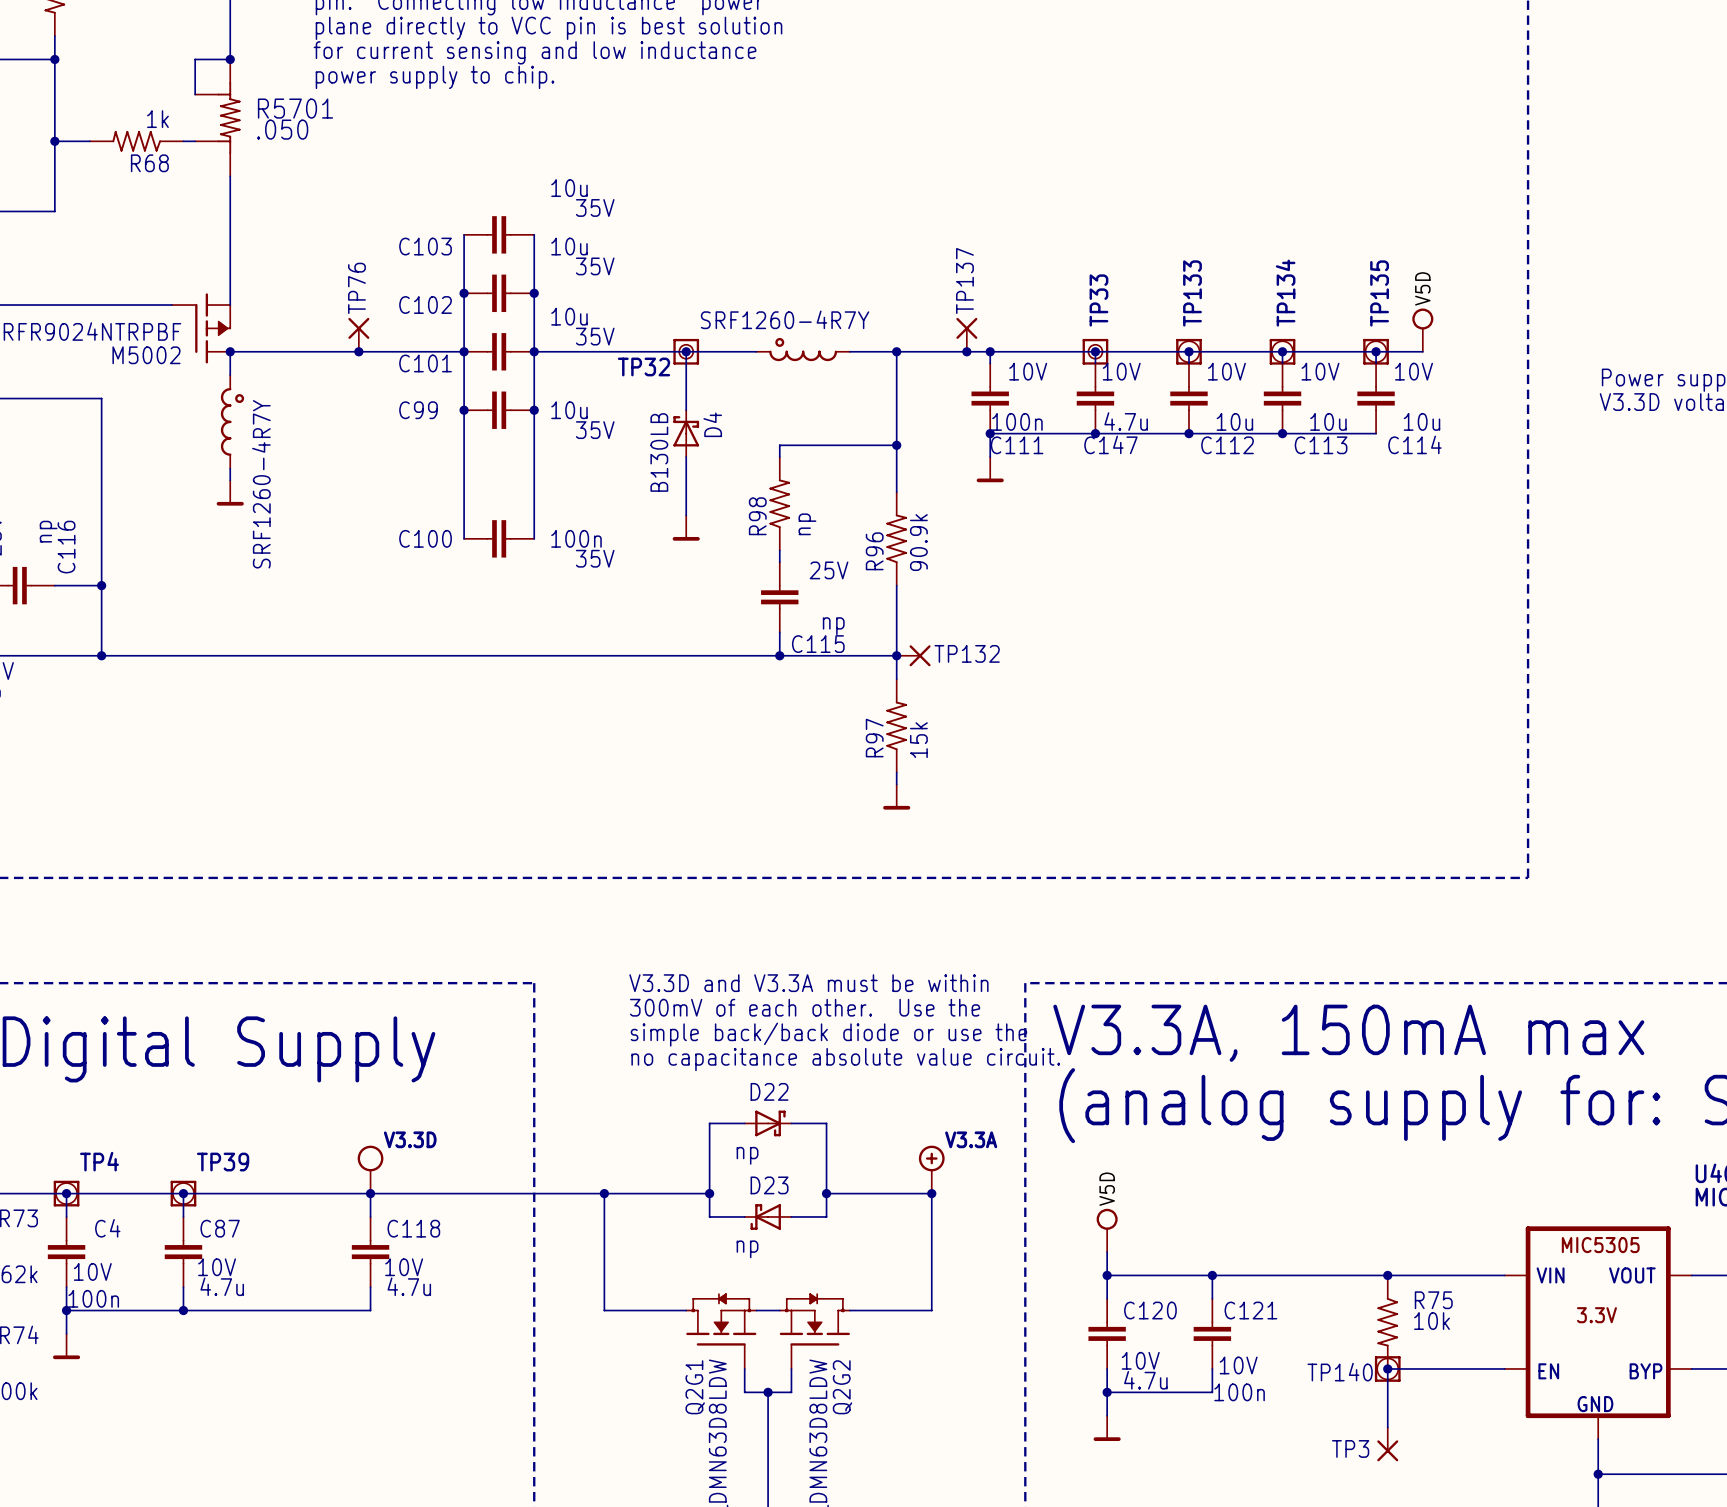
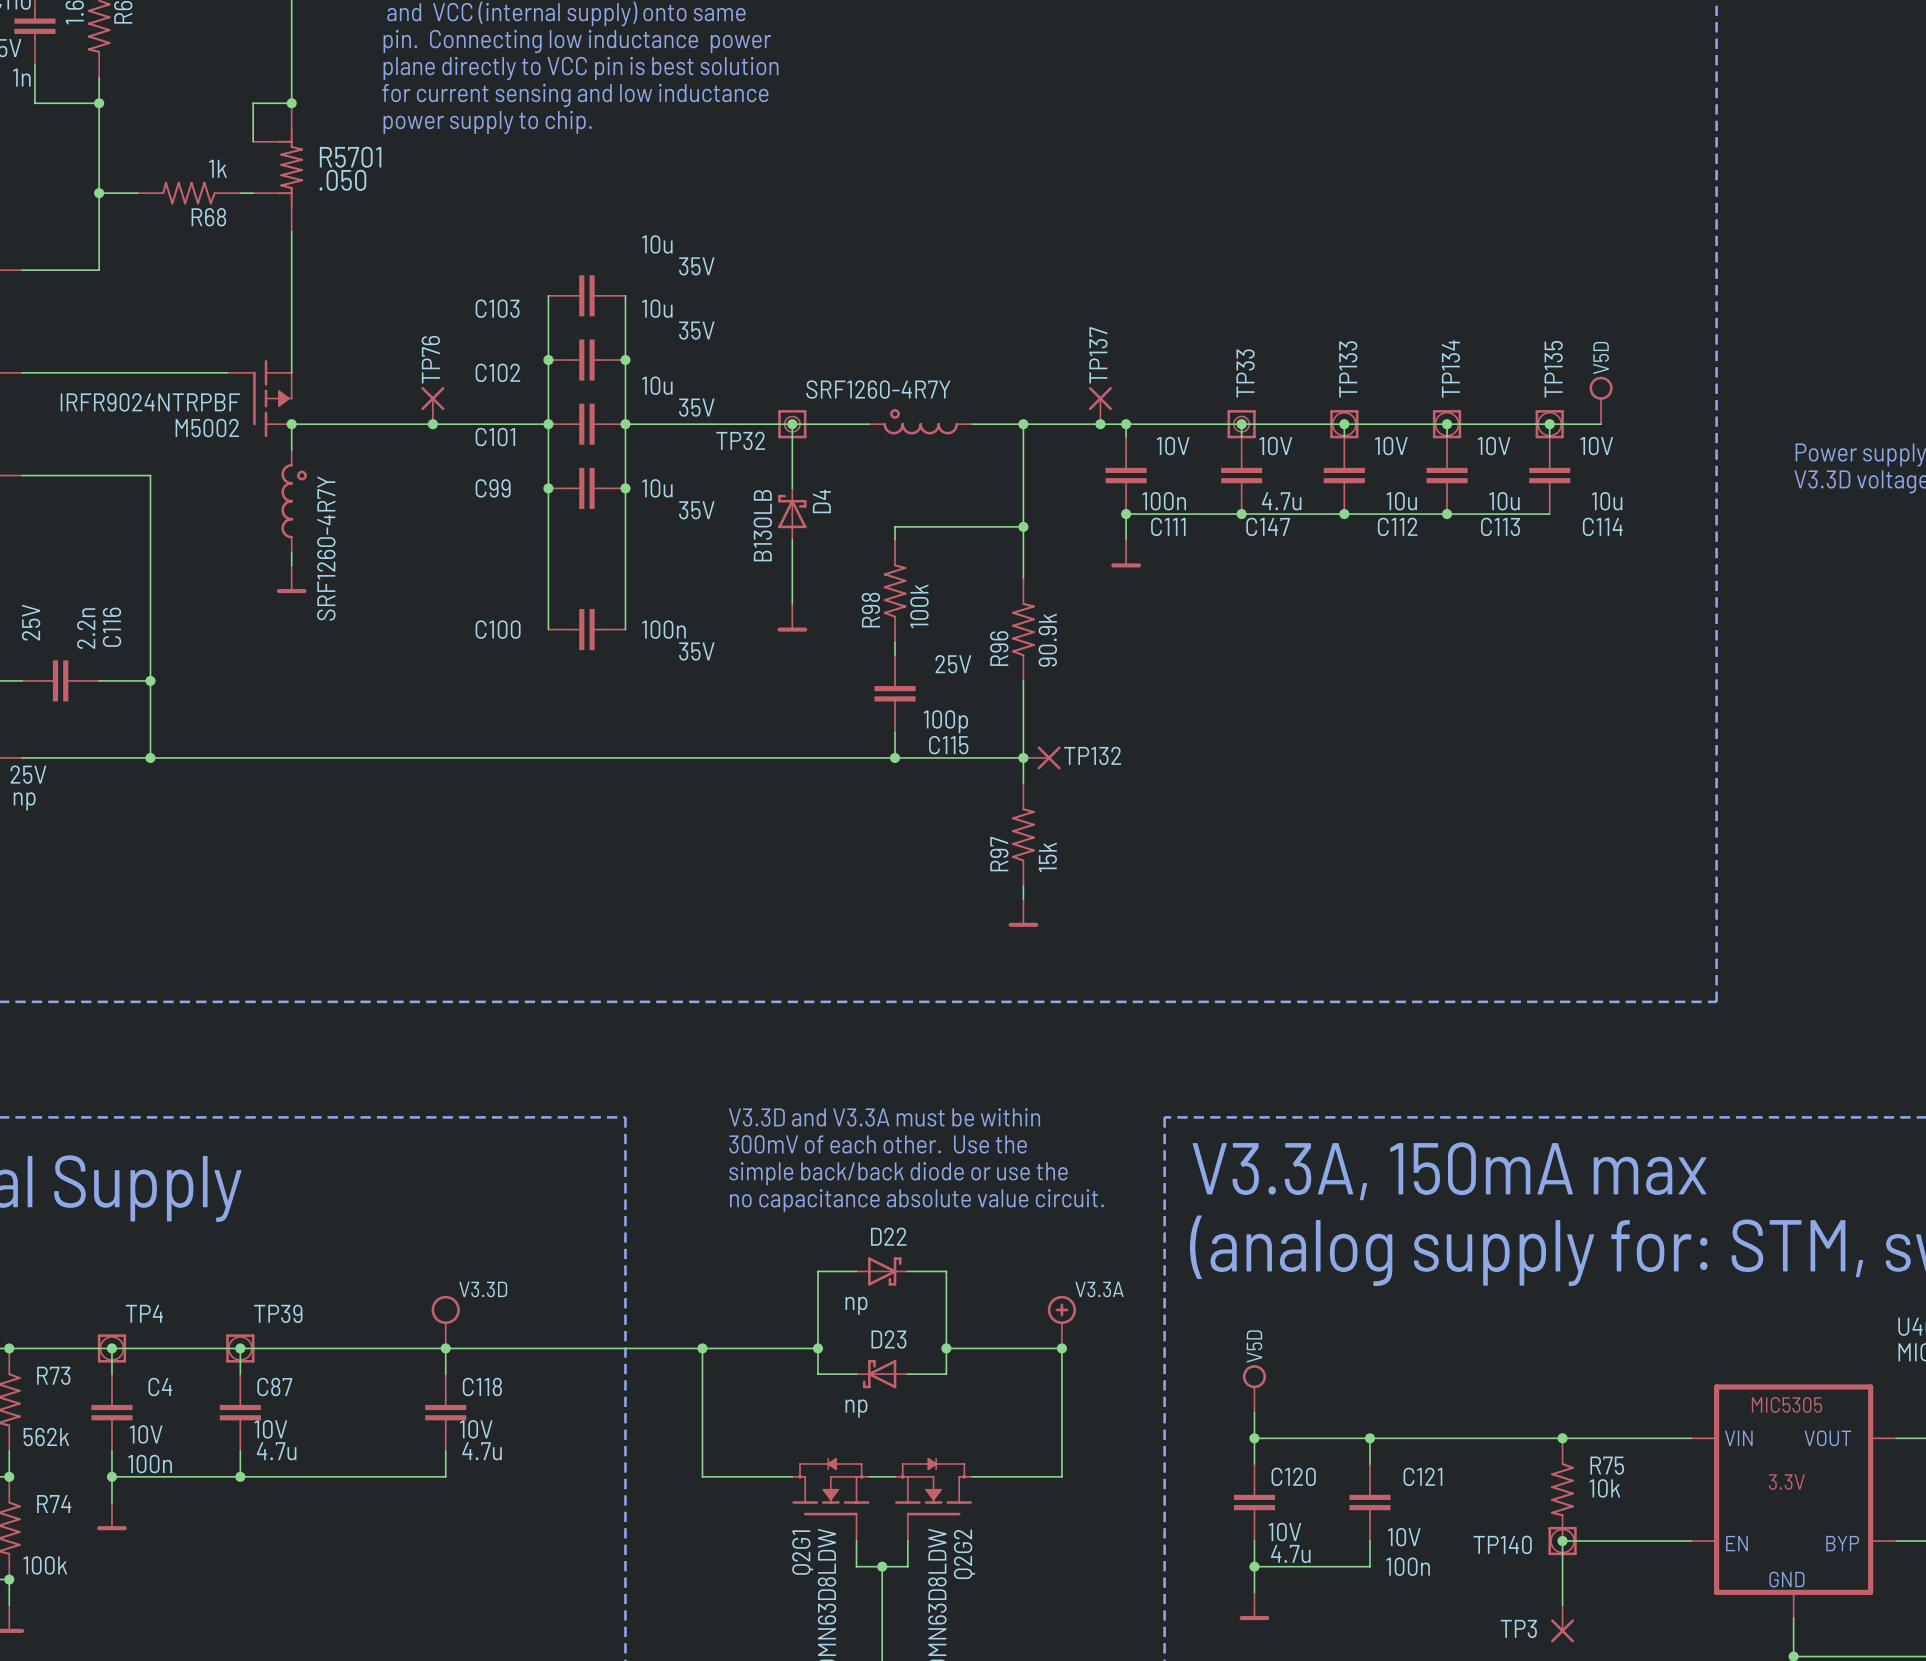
R98 value: np (807, 524) -> 100k (919, 606)
C116 value: np (48, 531) -> 2.2n (86, 628)
C115 value: np (833, 626) -> 100p (945, 721)

